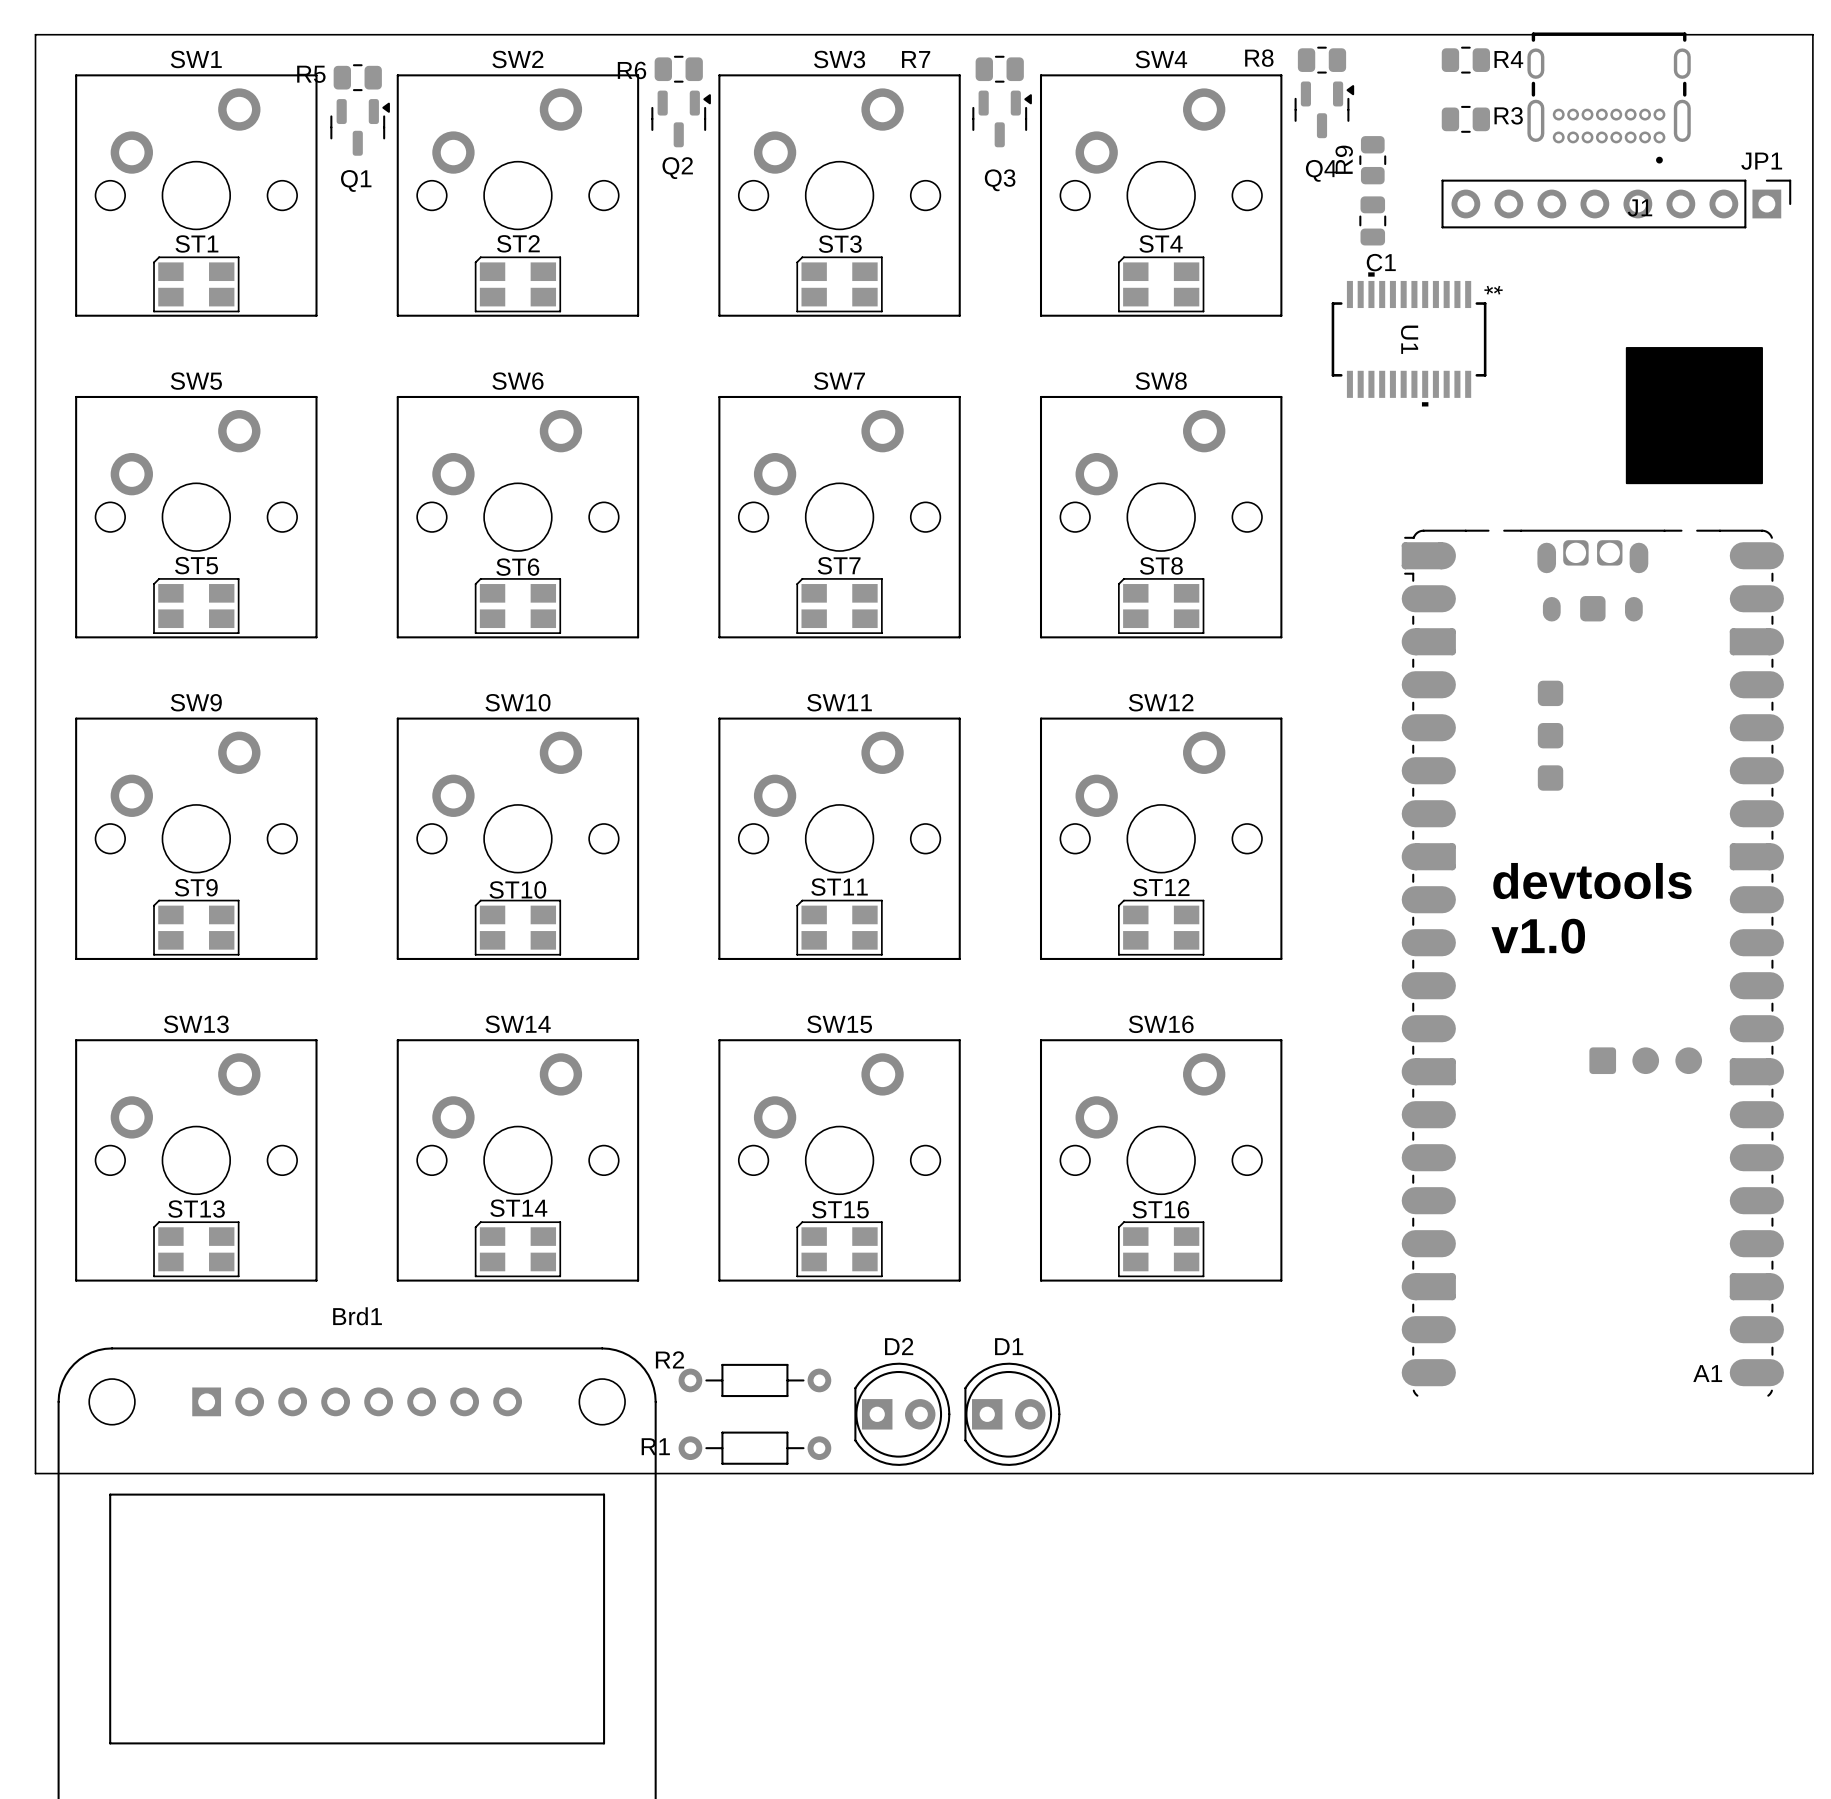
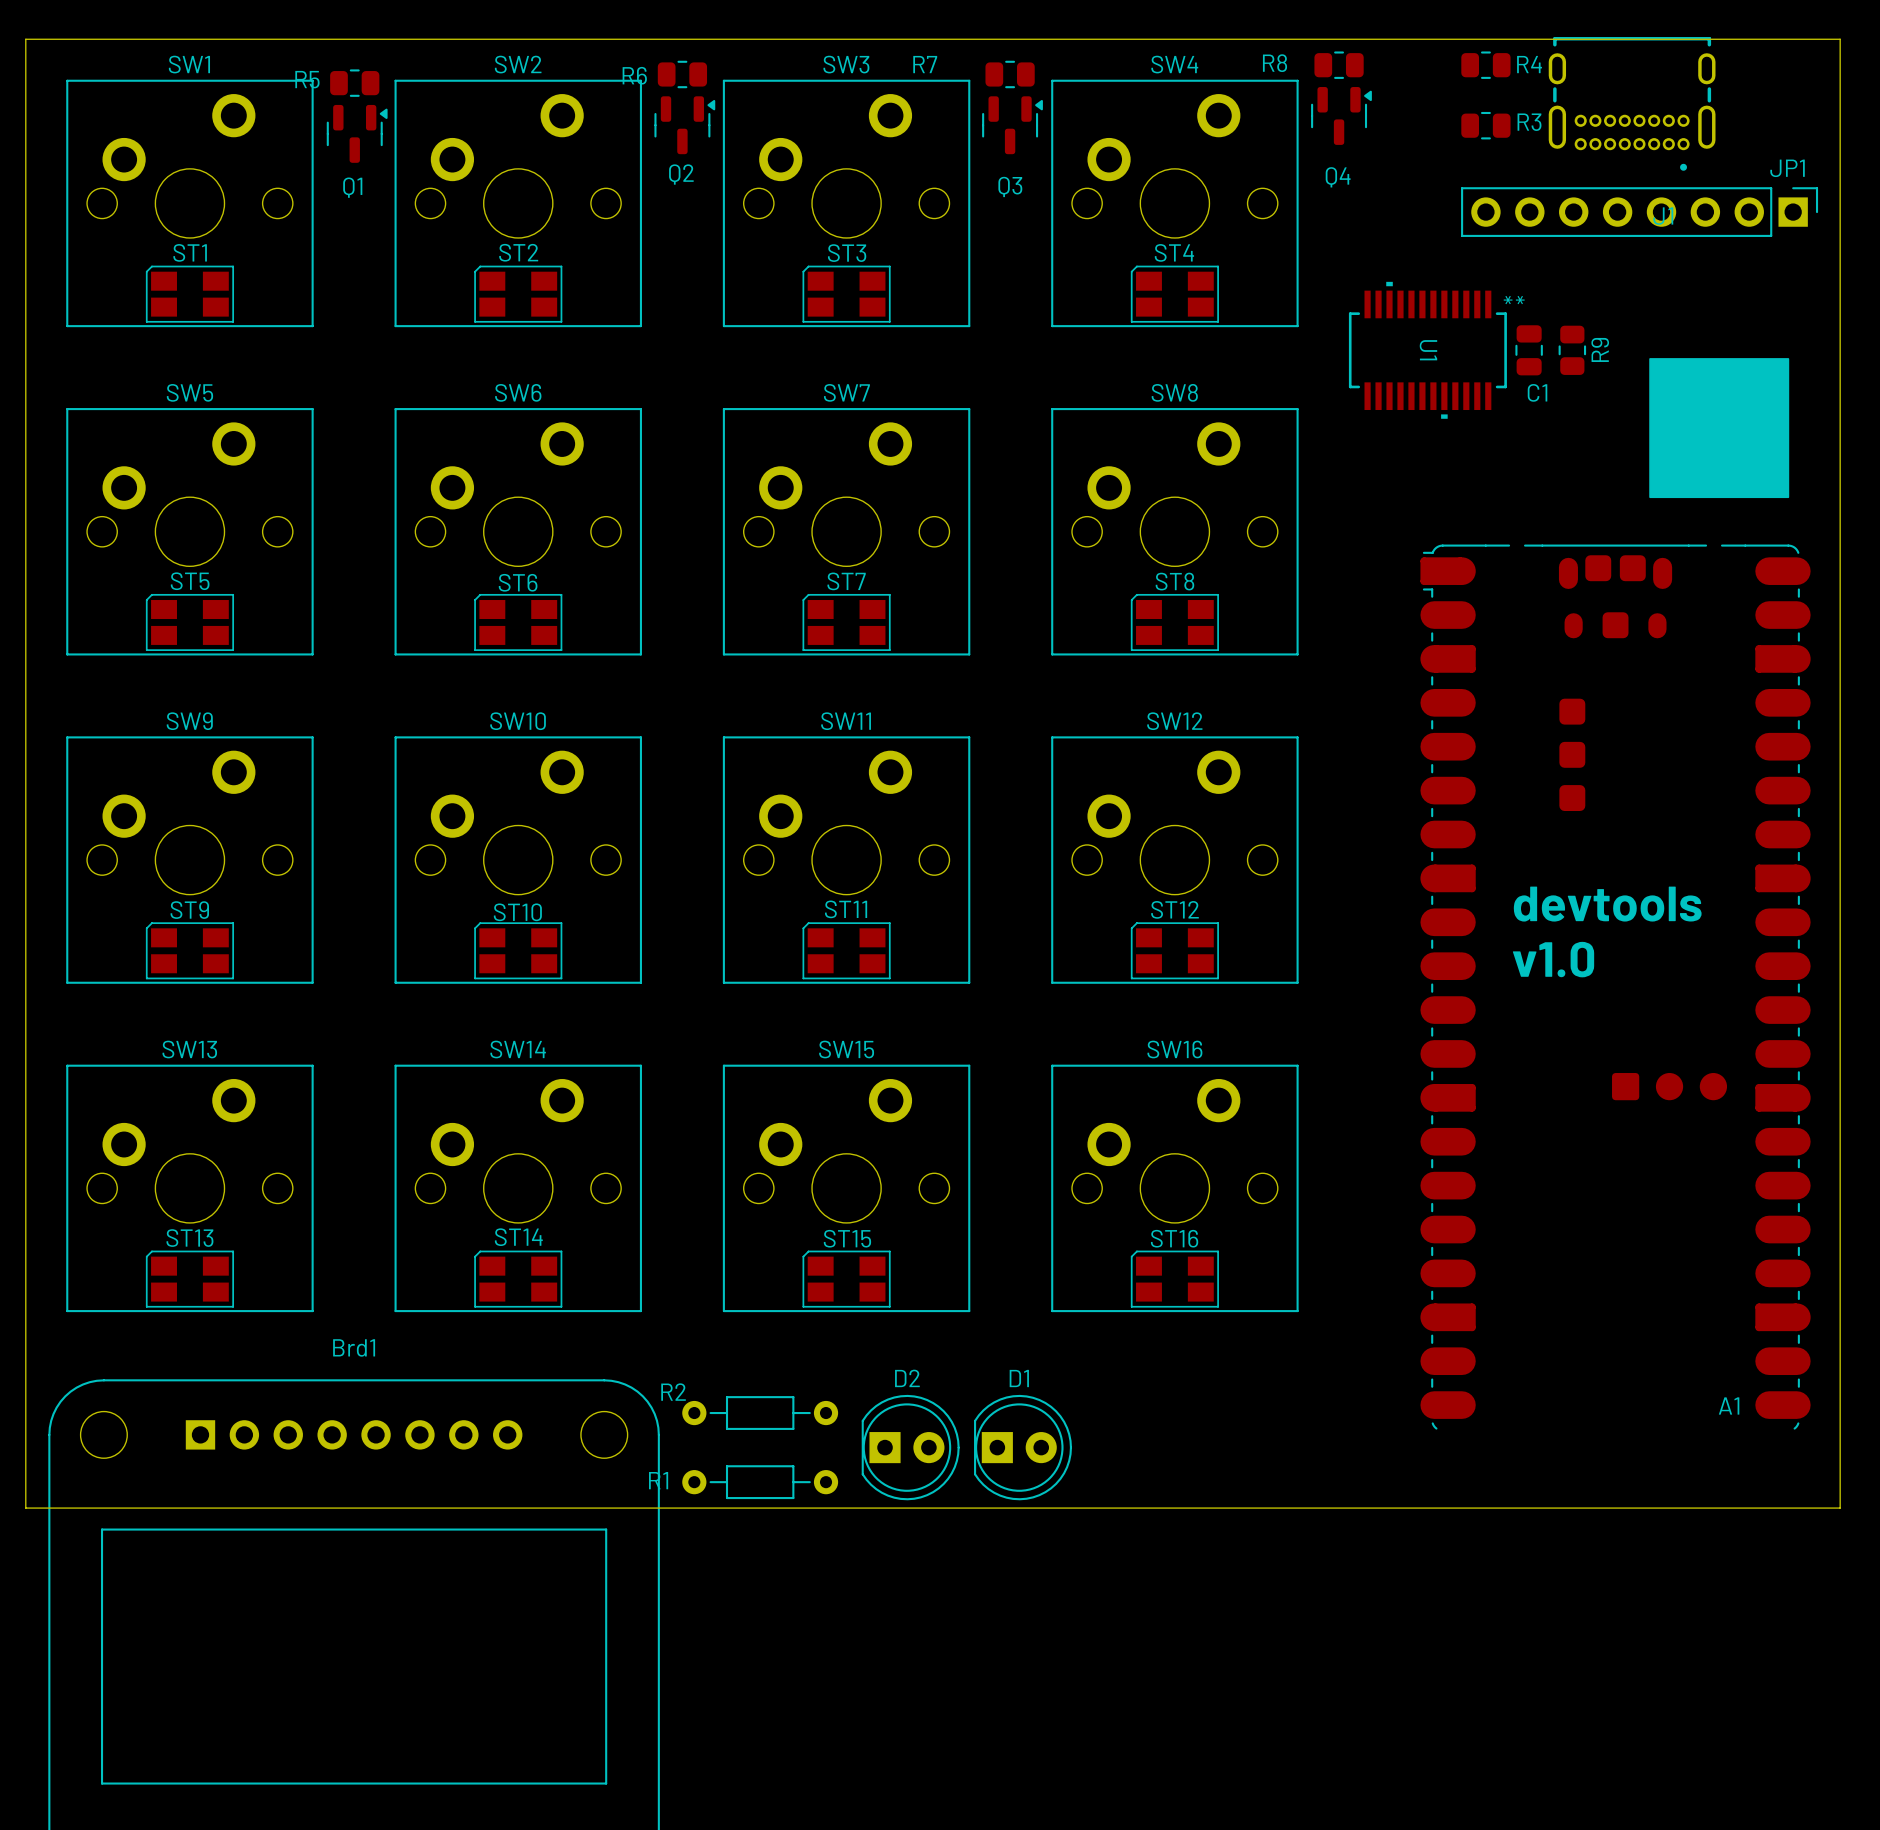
R9 name position: R9 (1344, 159) -> R9 (1600, 349)
R9 position: (1372, 160) -> (1572, 350)
C1 position: (1372, 220) -> (1529, 350)
A1 footprint: [1401, 529, 1784, 1397] -> [1420, 544, 1811, 1430]

